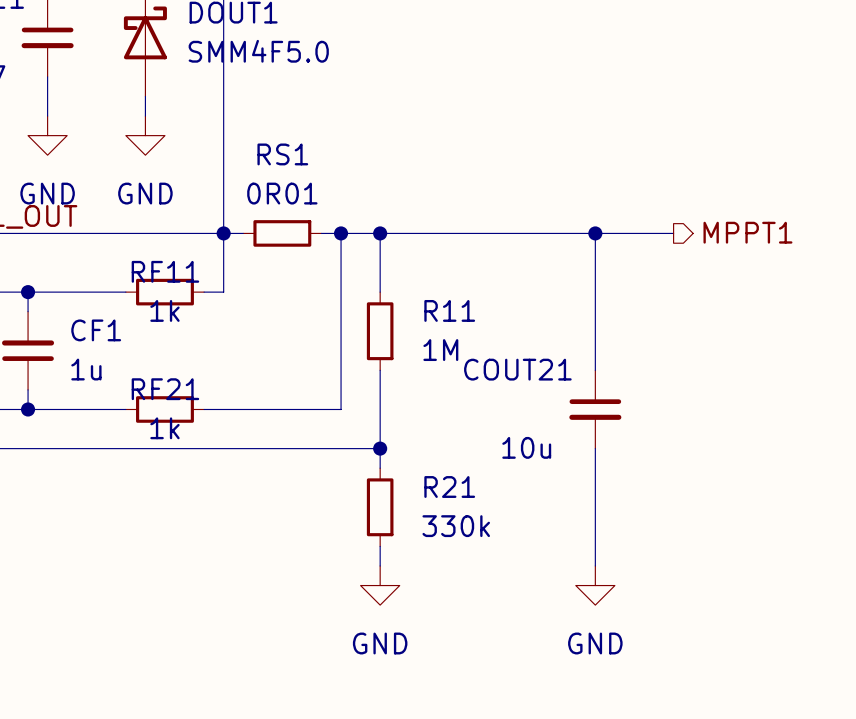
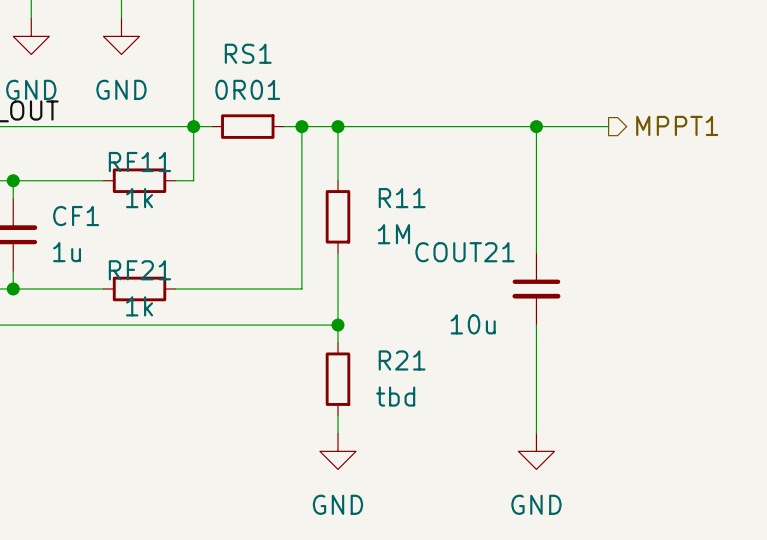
R21 value: 330k (456, 526) -> tbd (395, 396)

